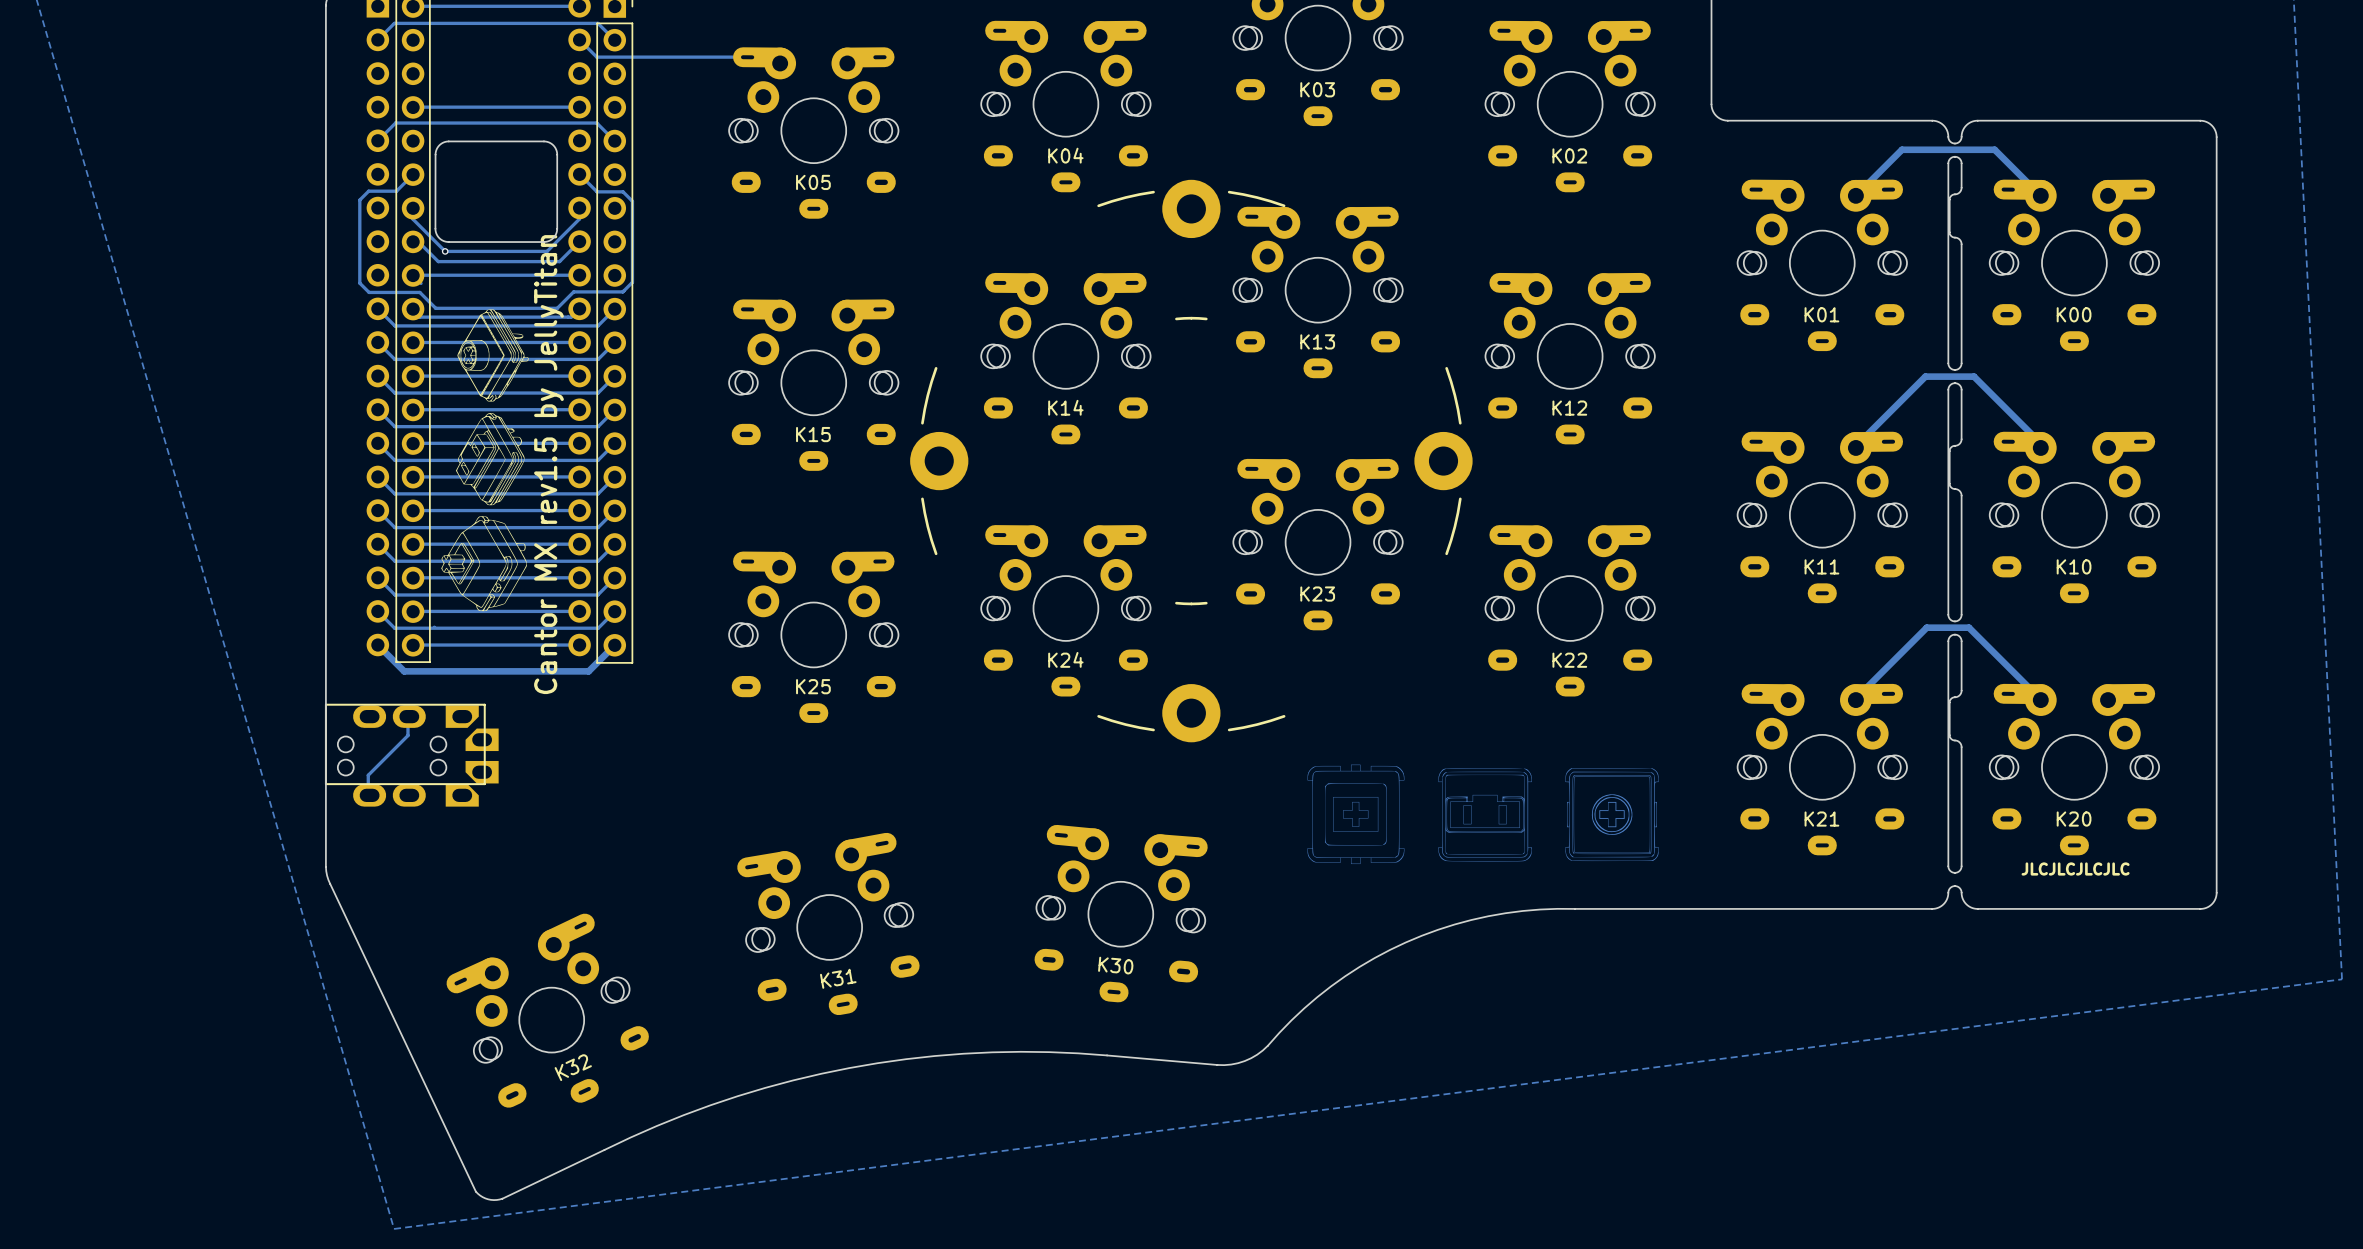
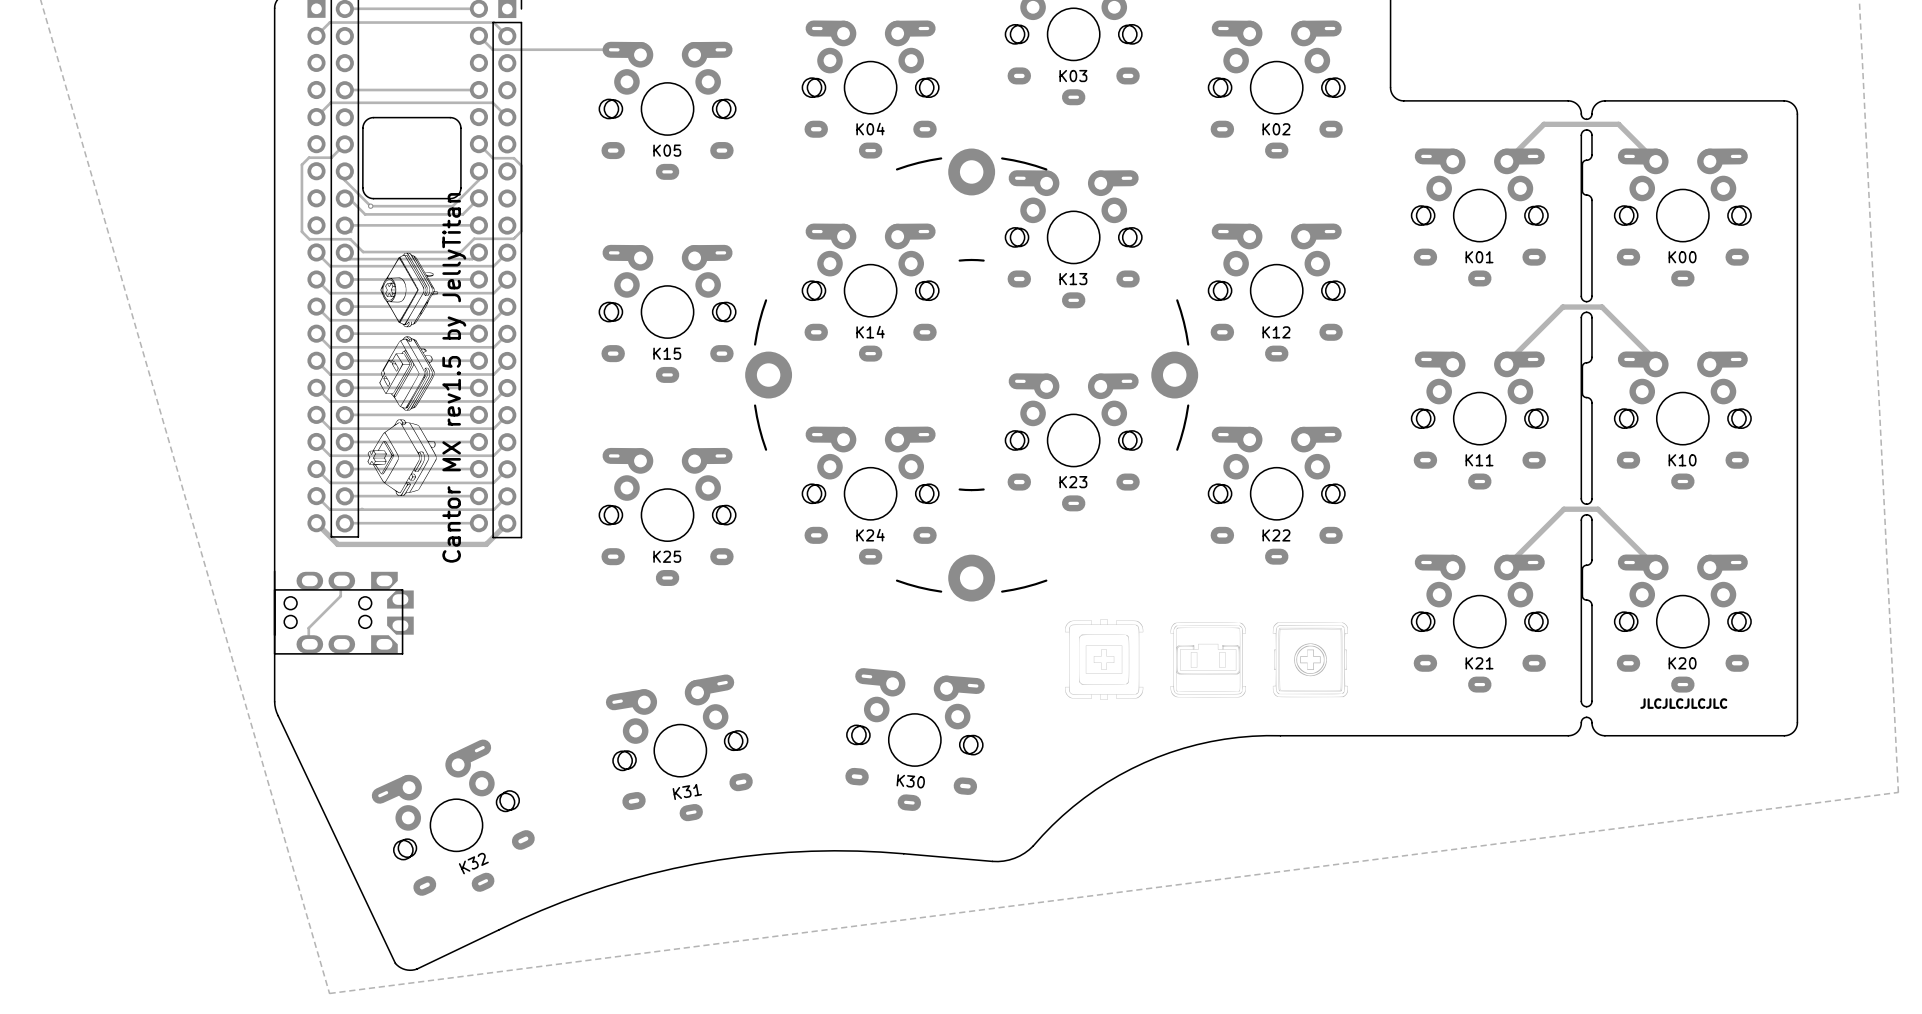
part footprint: [324, 703, 499, 807] -> [273, 570, 414, 655]

